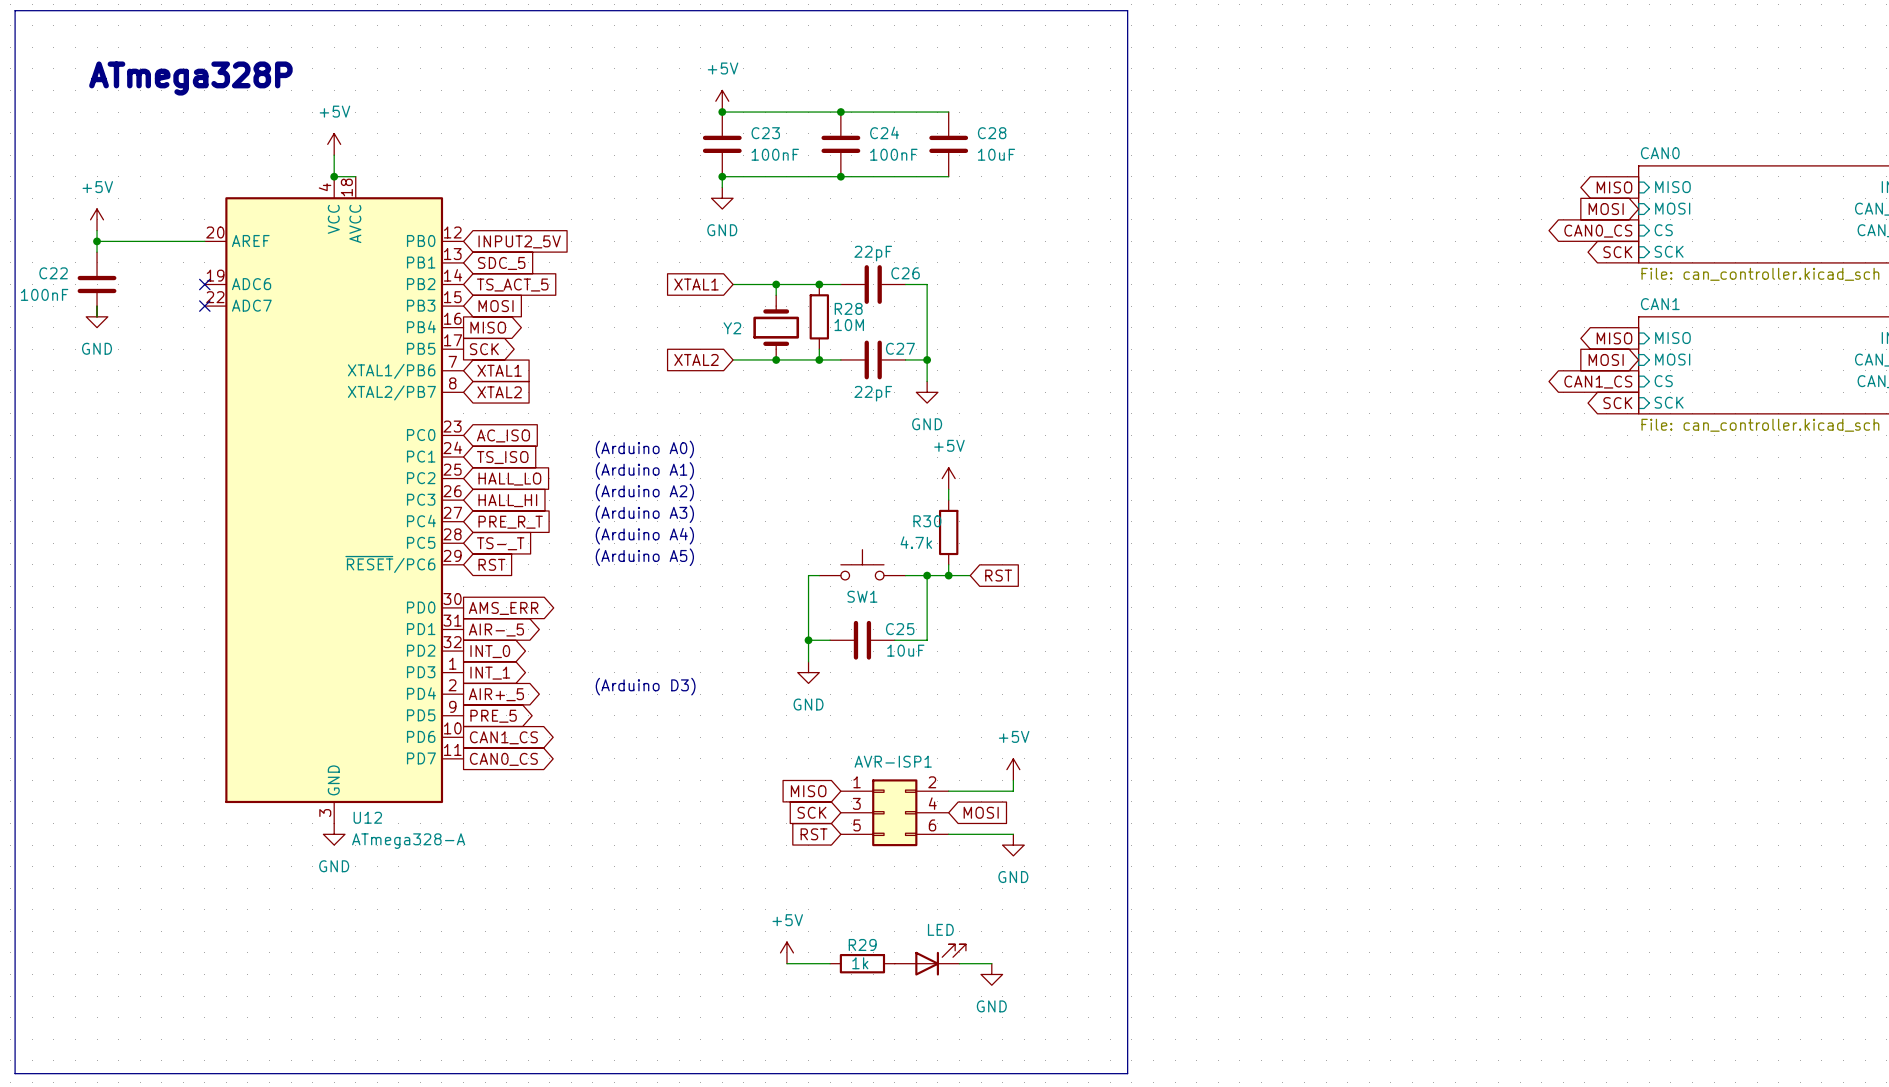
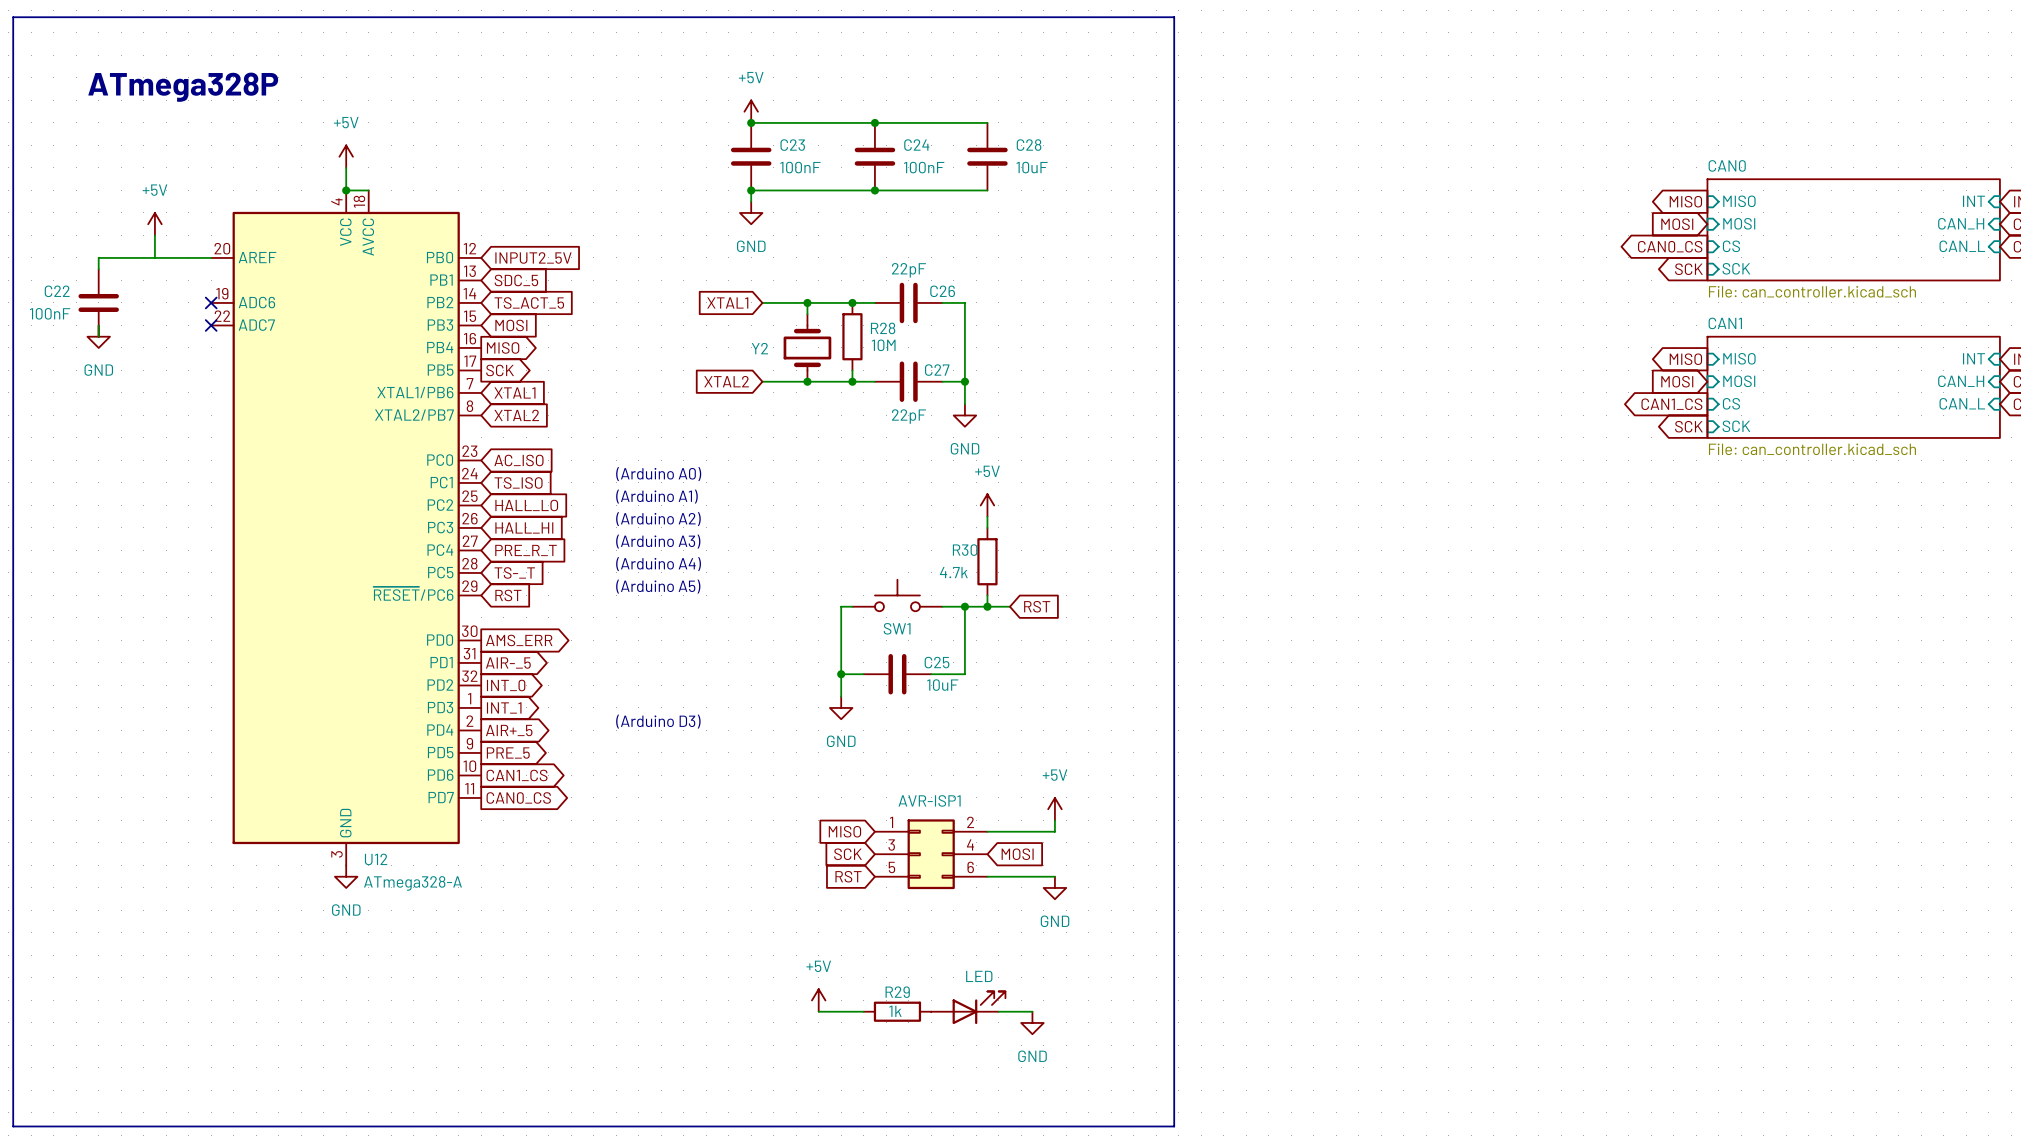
power symbol position: +5V (97, 219) -> +5V (154, 224)
wire: none -> (154, 235) (154, 257)
wire: (97, 230) (97, 241) -> none
junction: (97, 241) -> none

